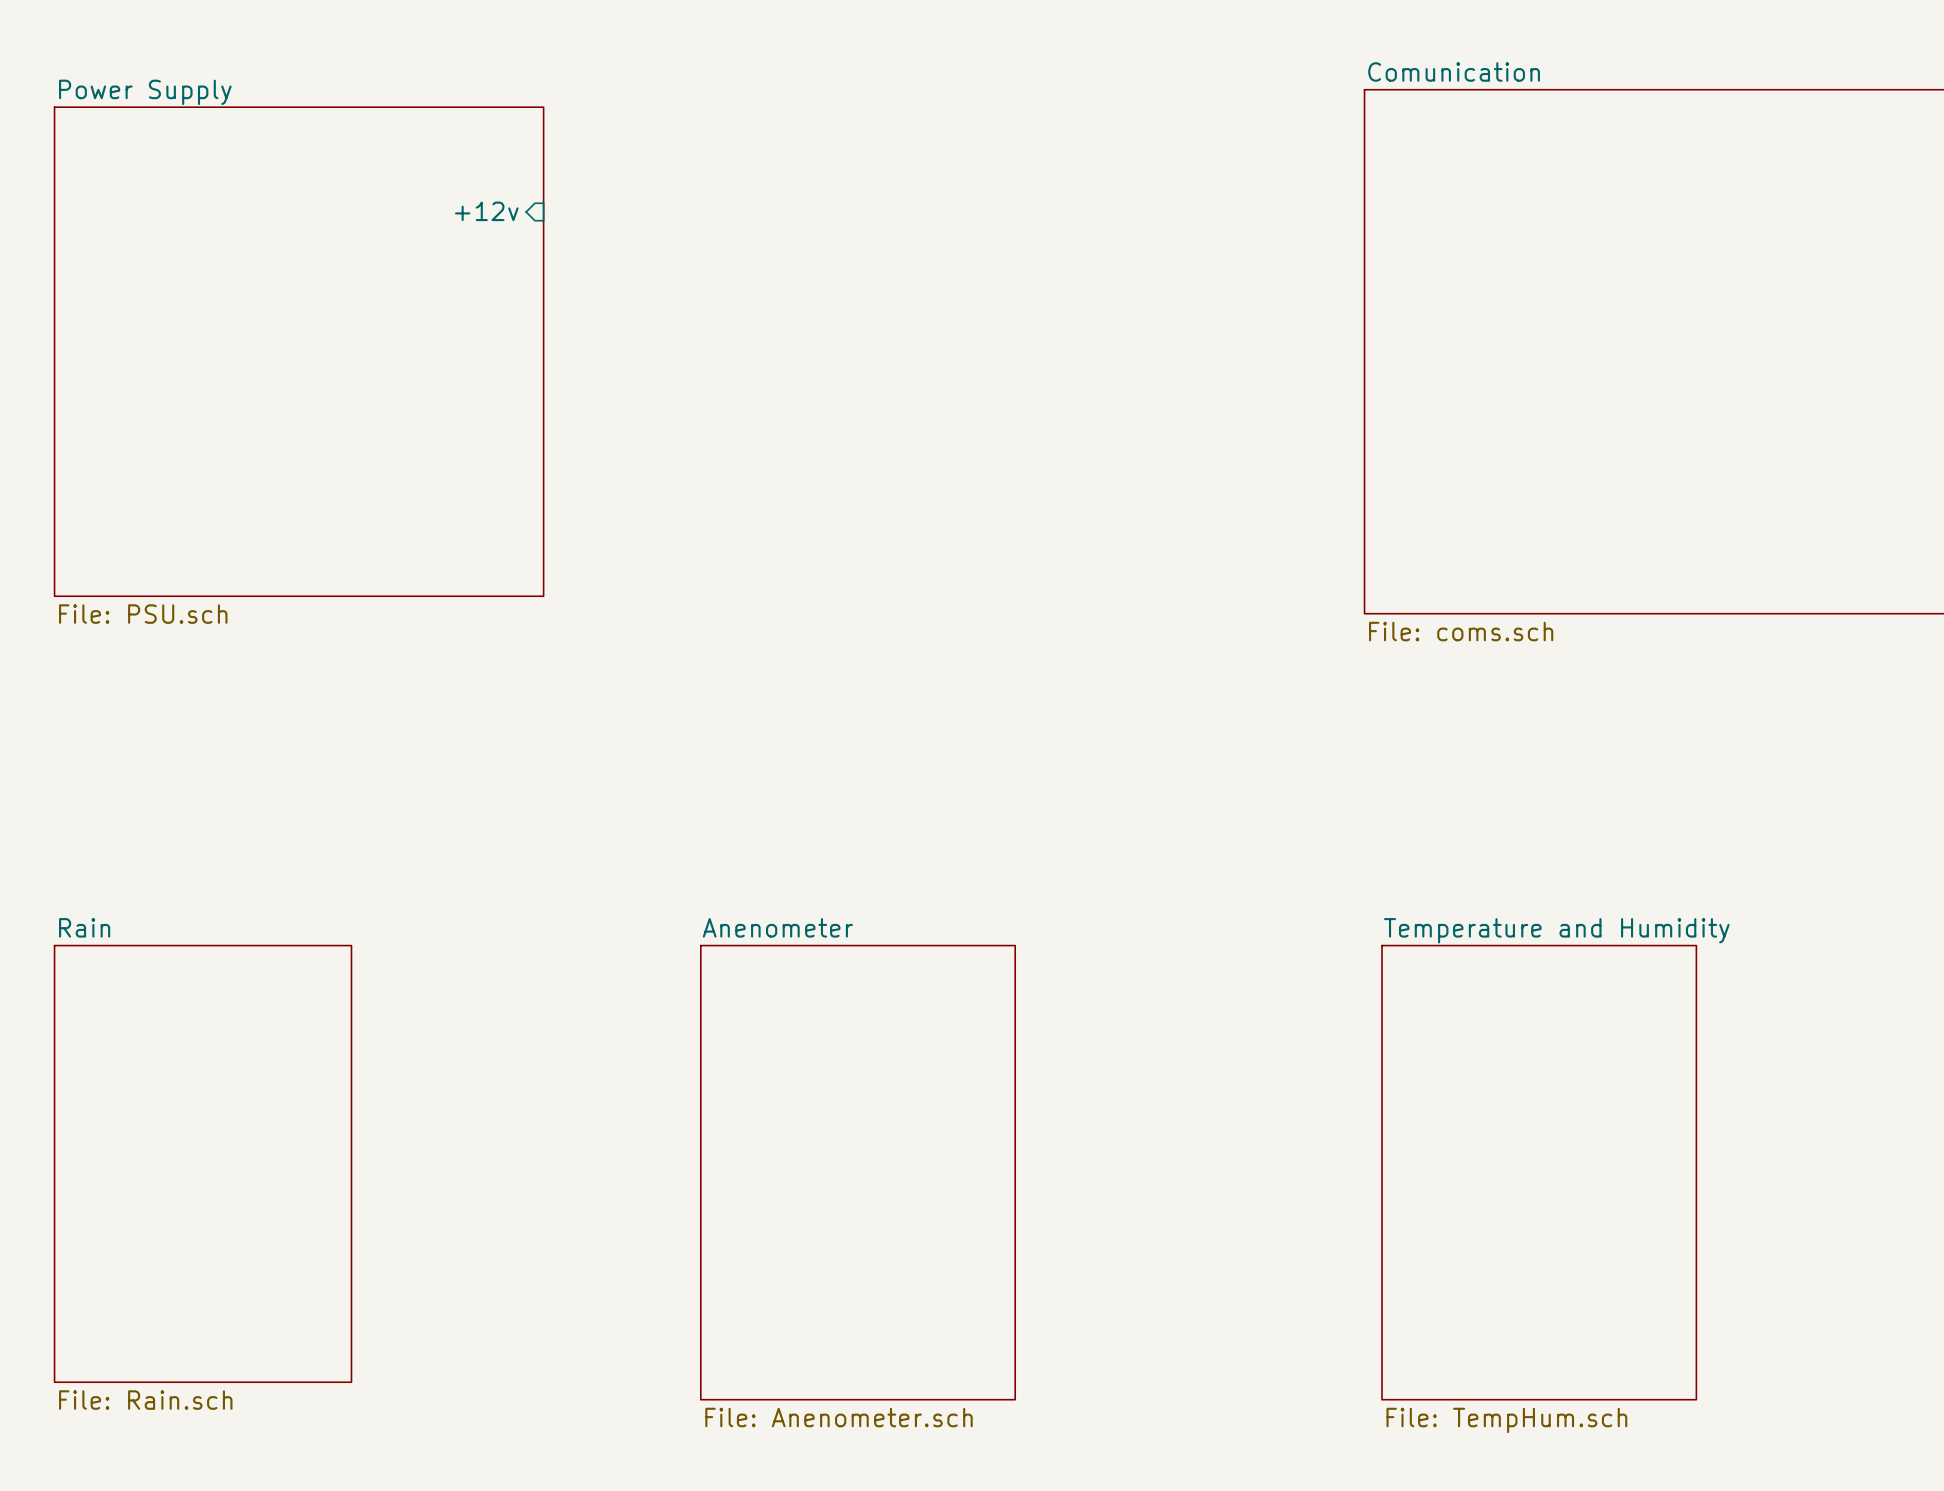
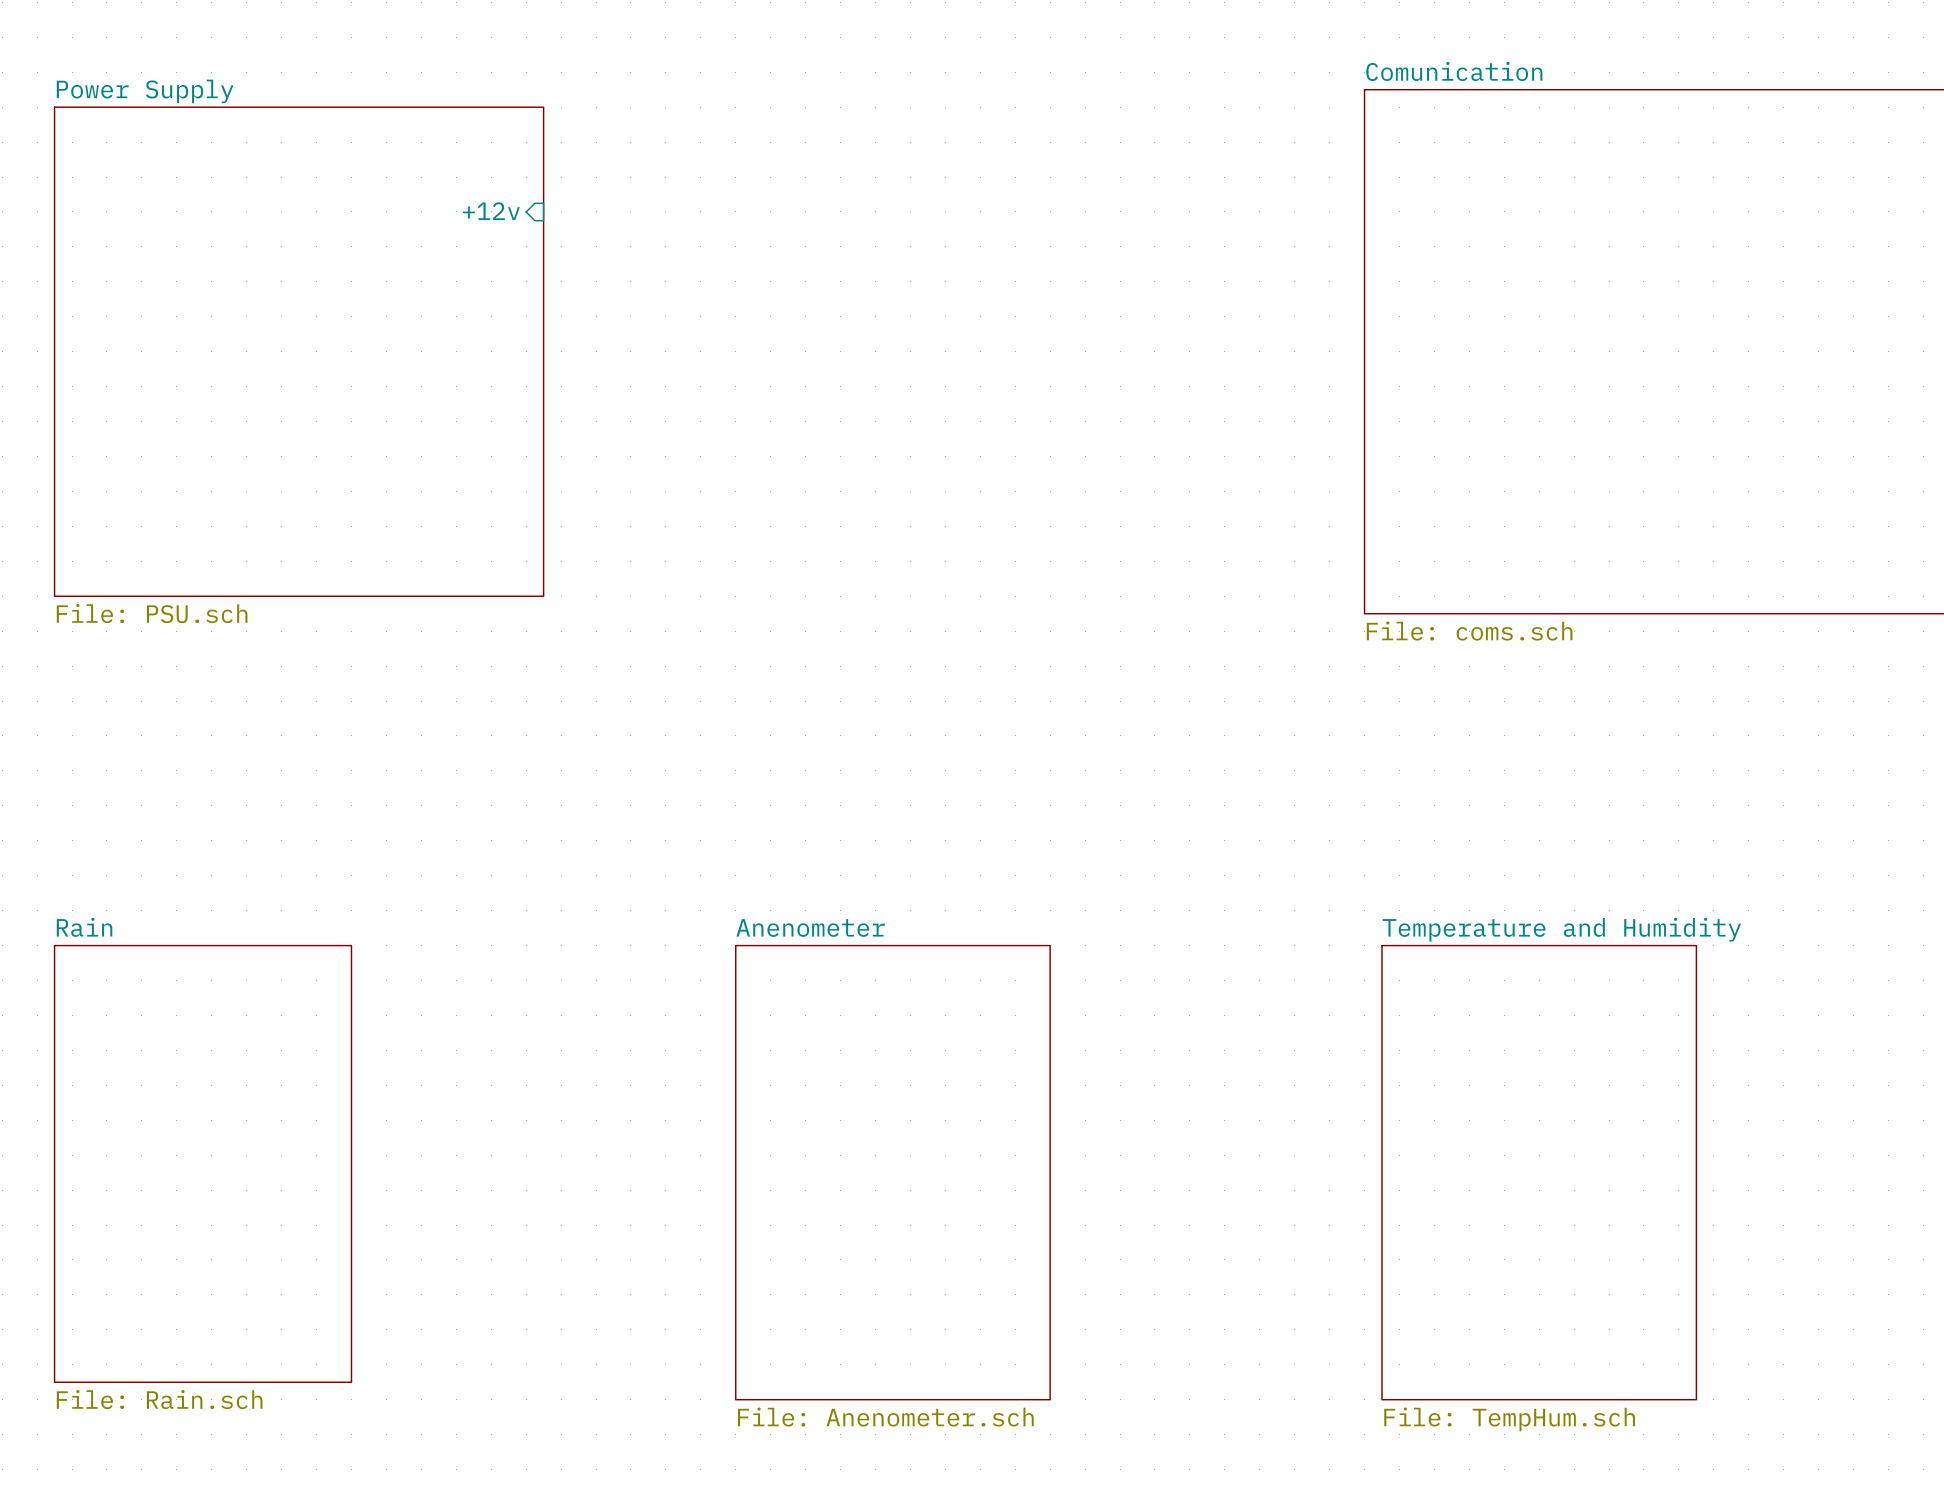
sheet Anenometer position: (858, 1172) -> (892, 1172)

